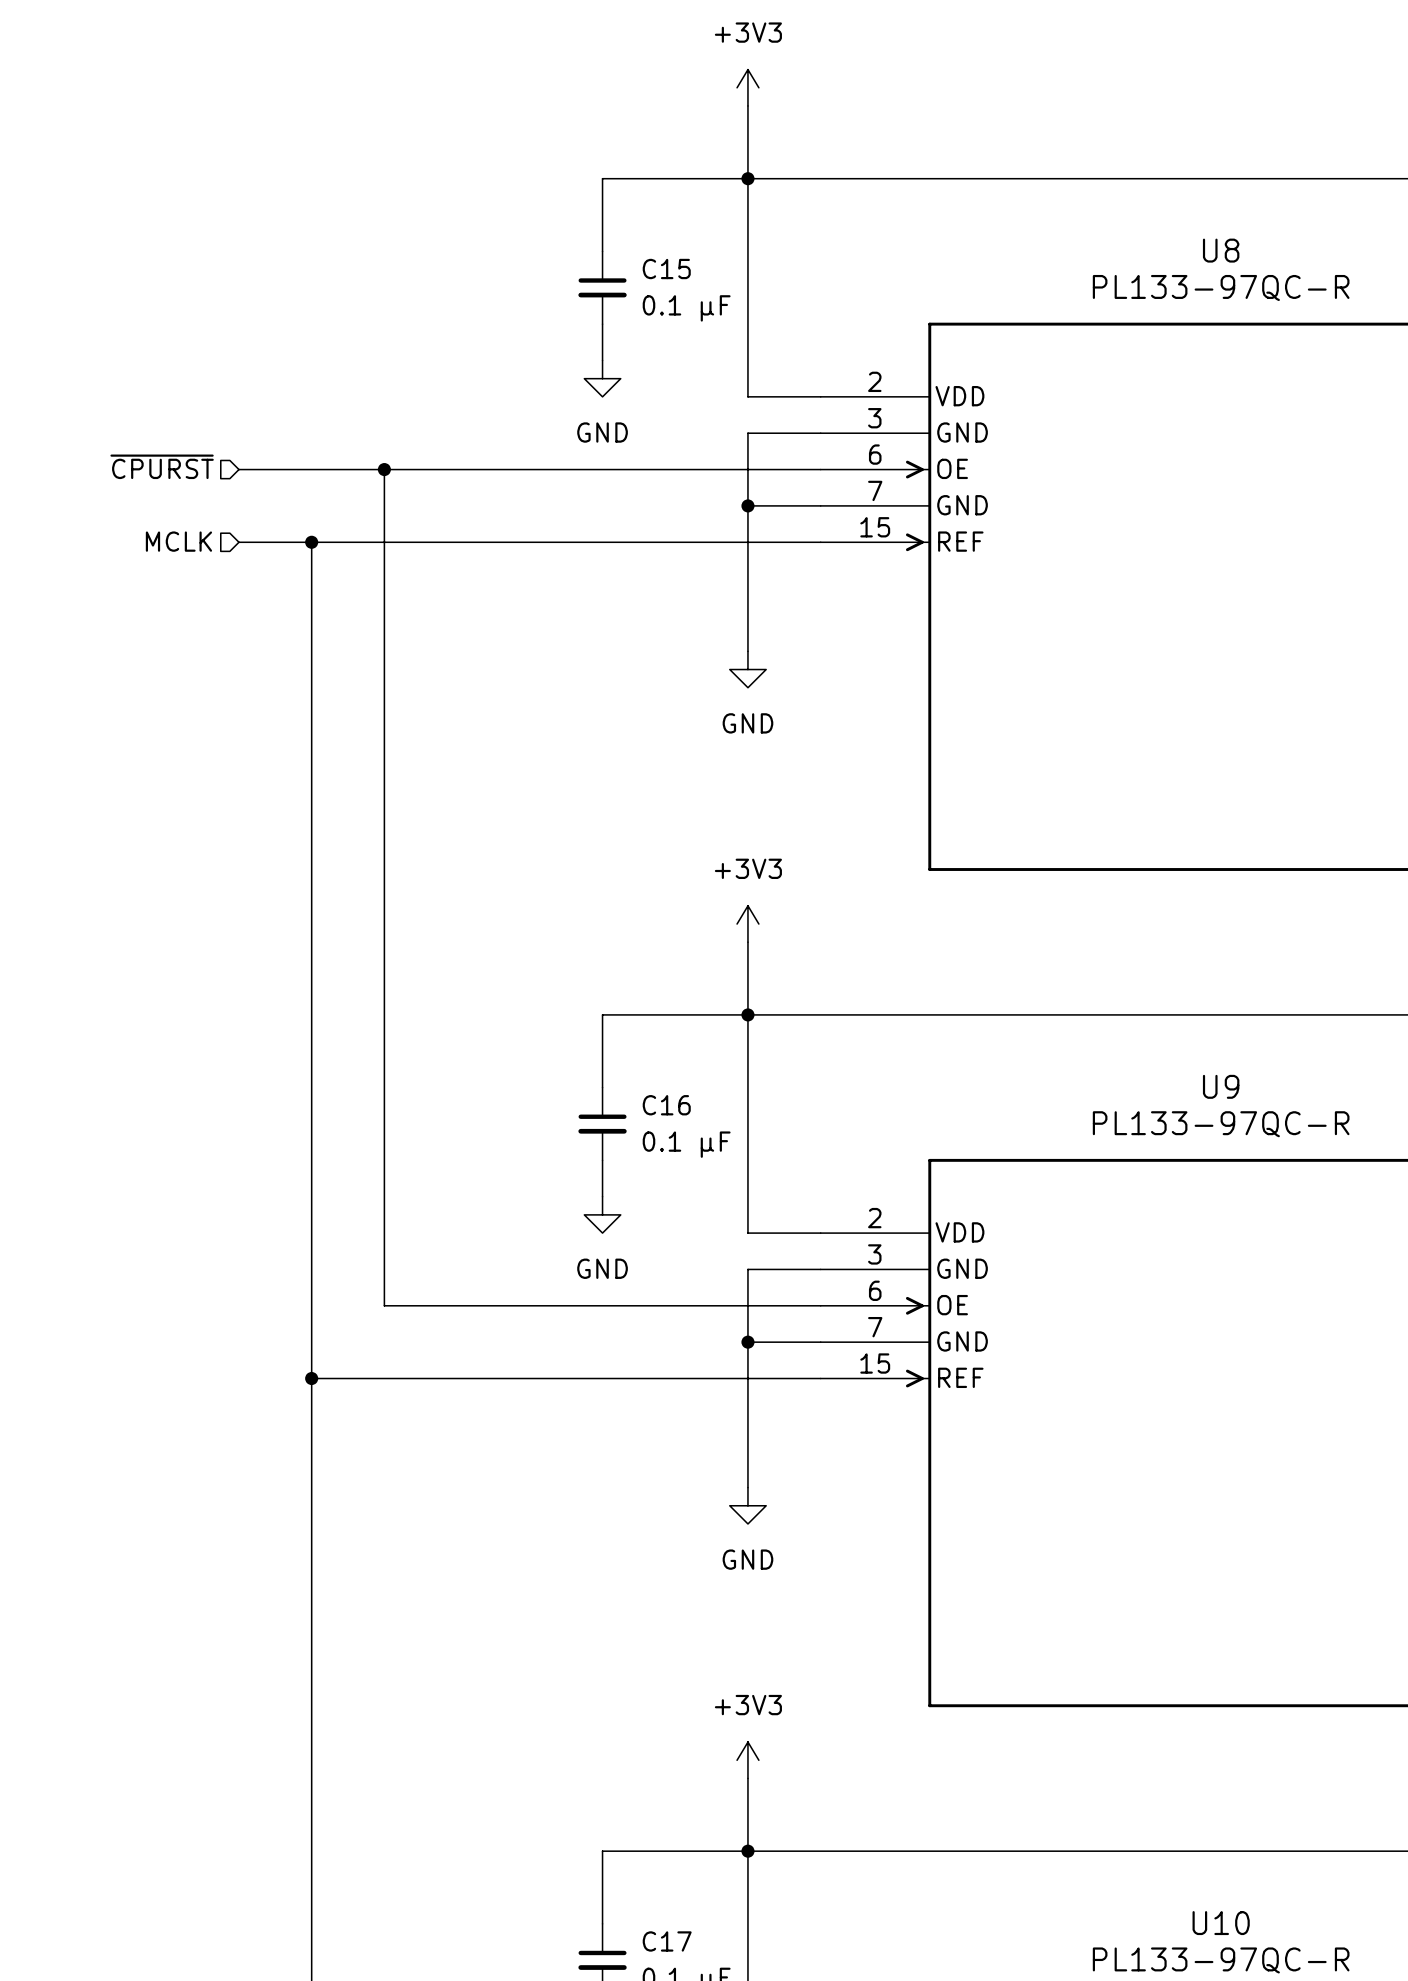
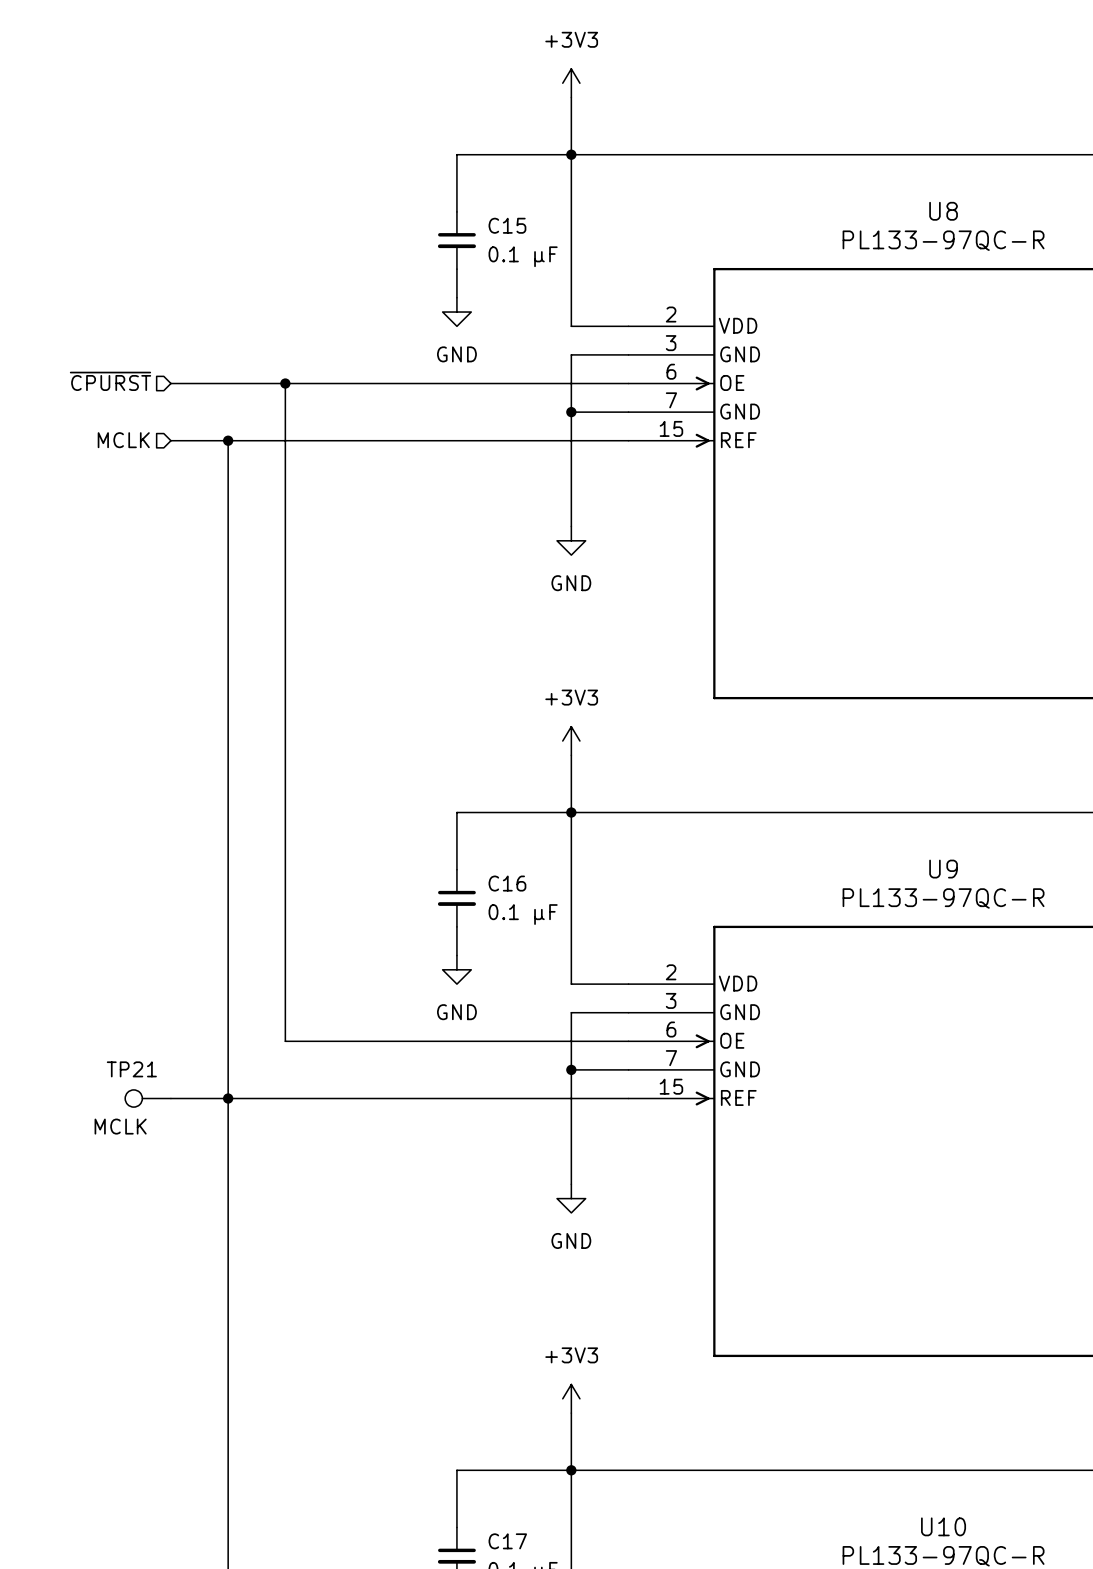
TP21: none -> MCLK (148, 1098)
wire: none -> (170, 1098) (228, 1098)

